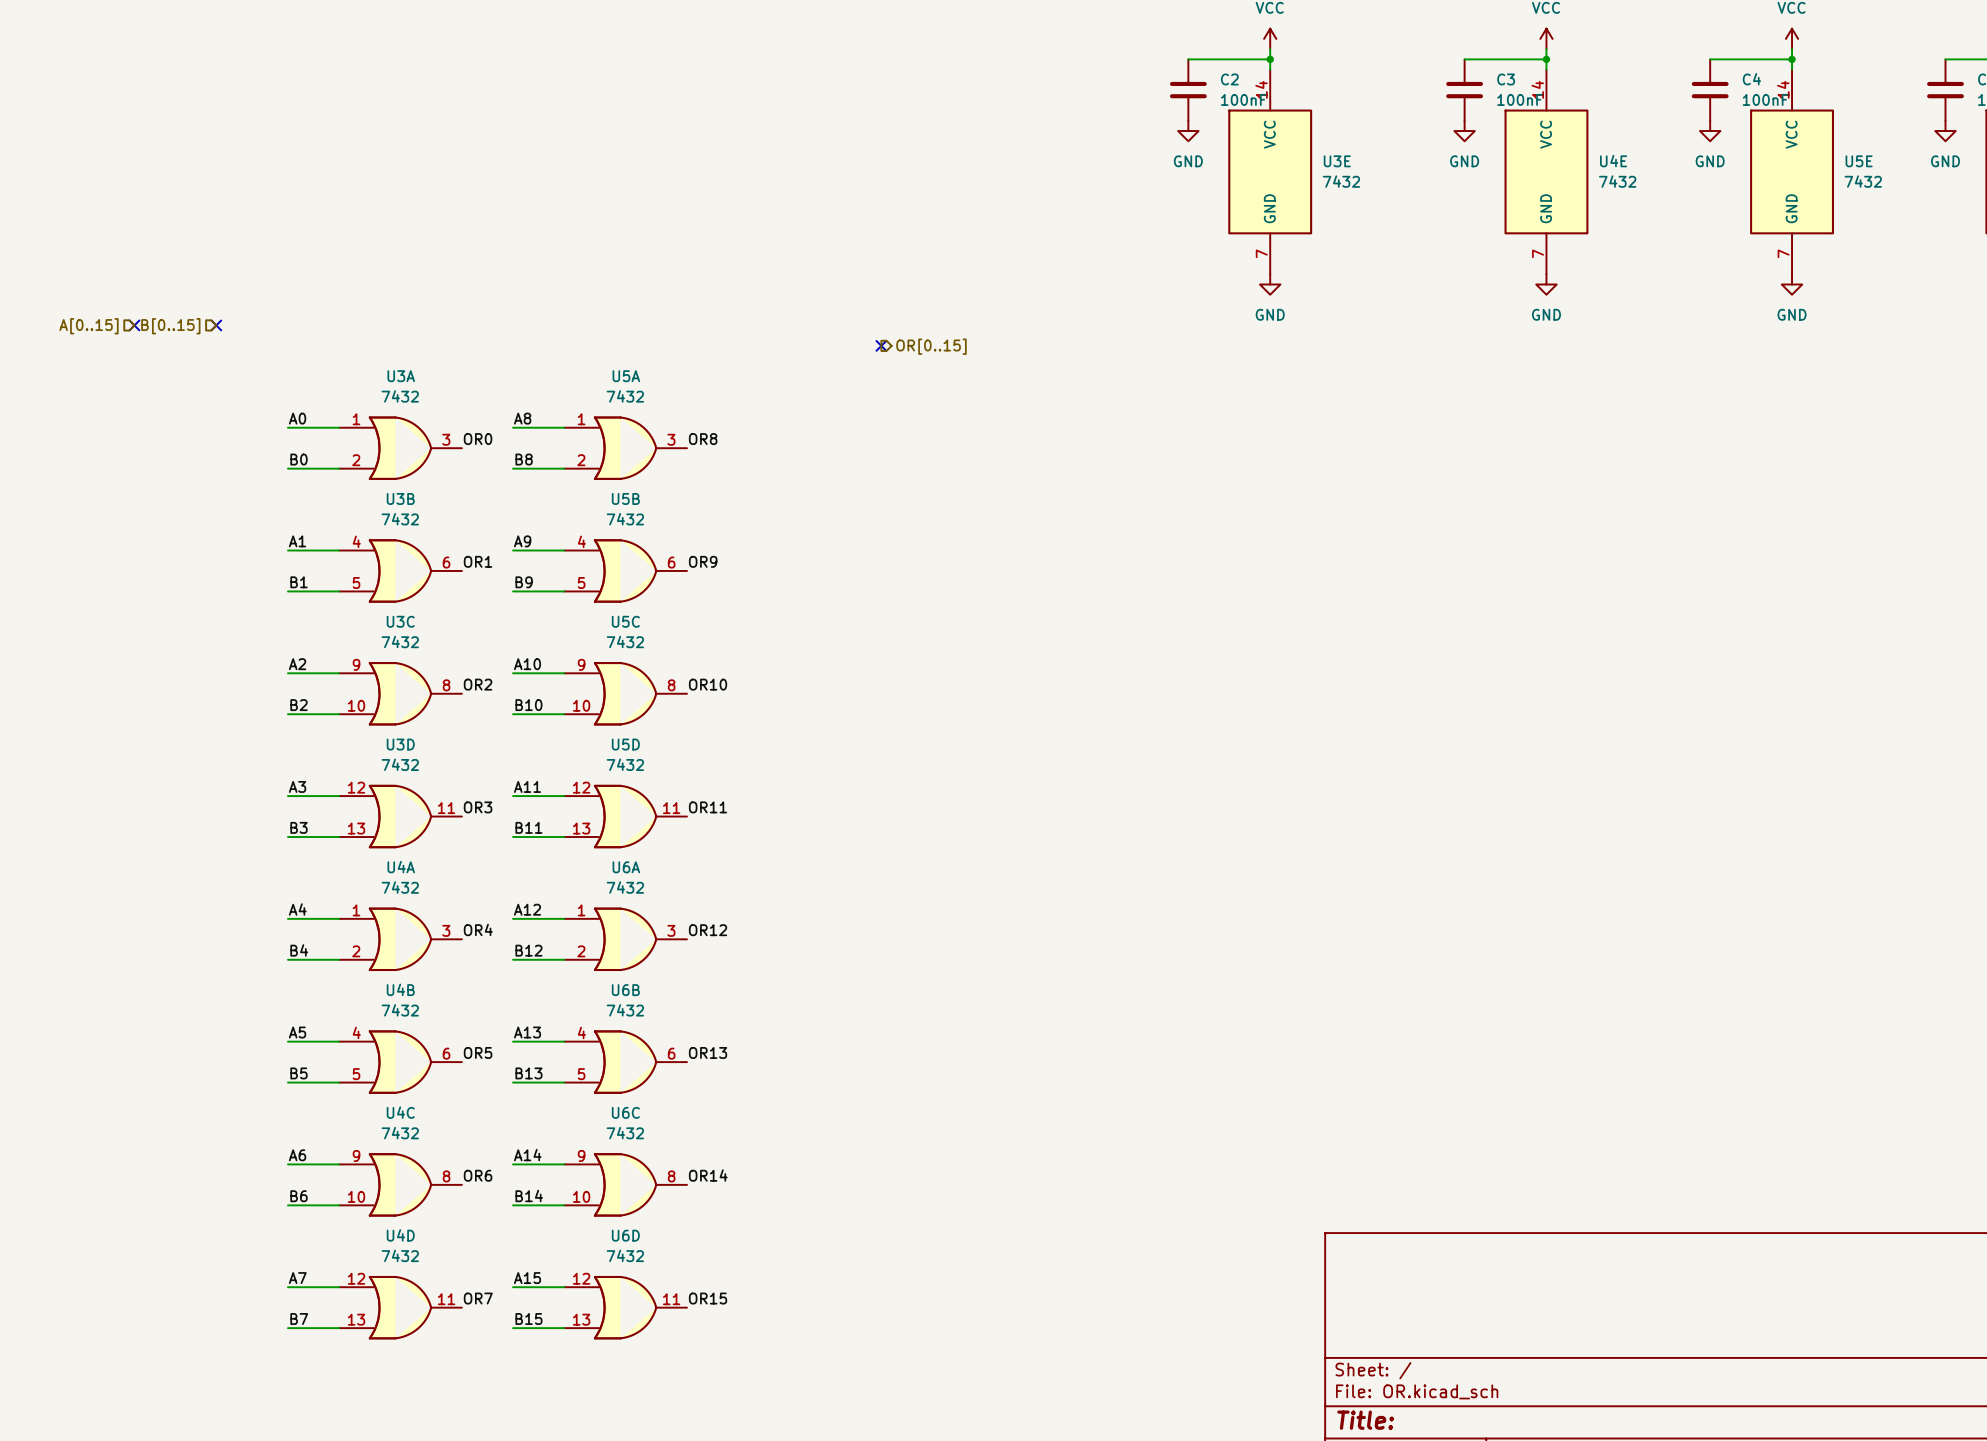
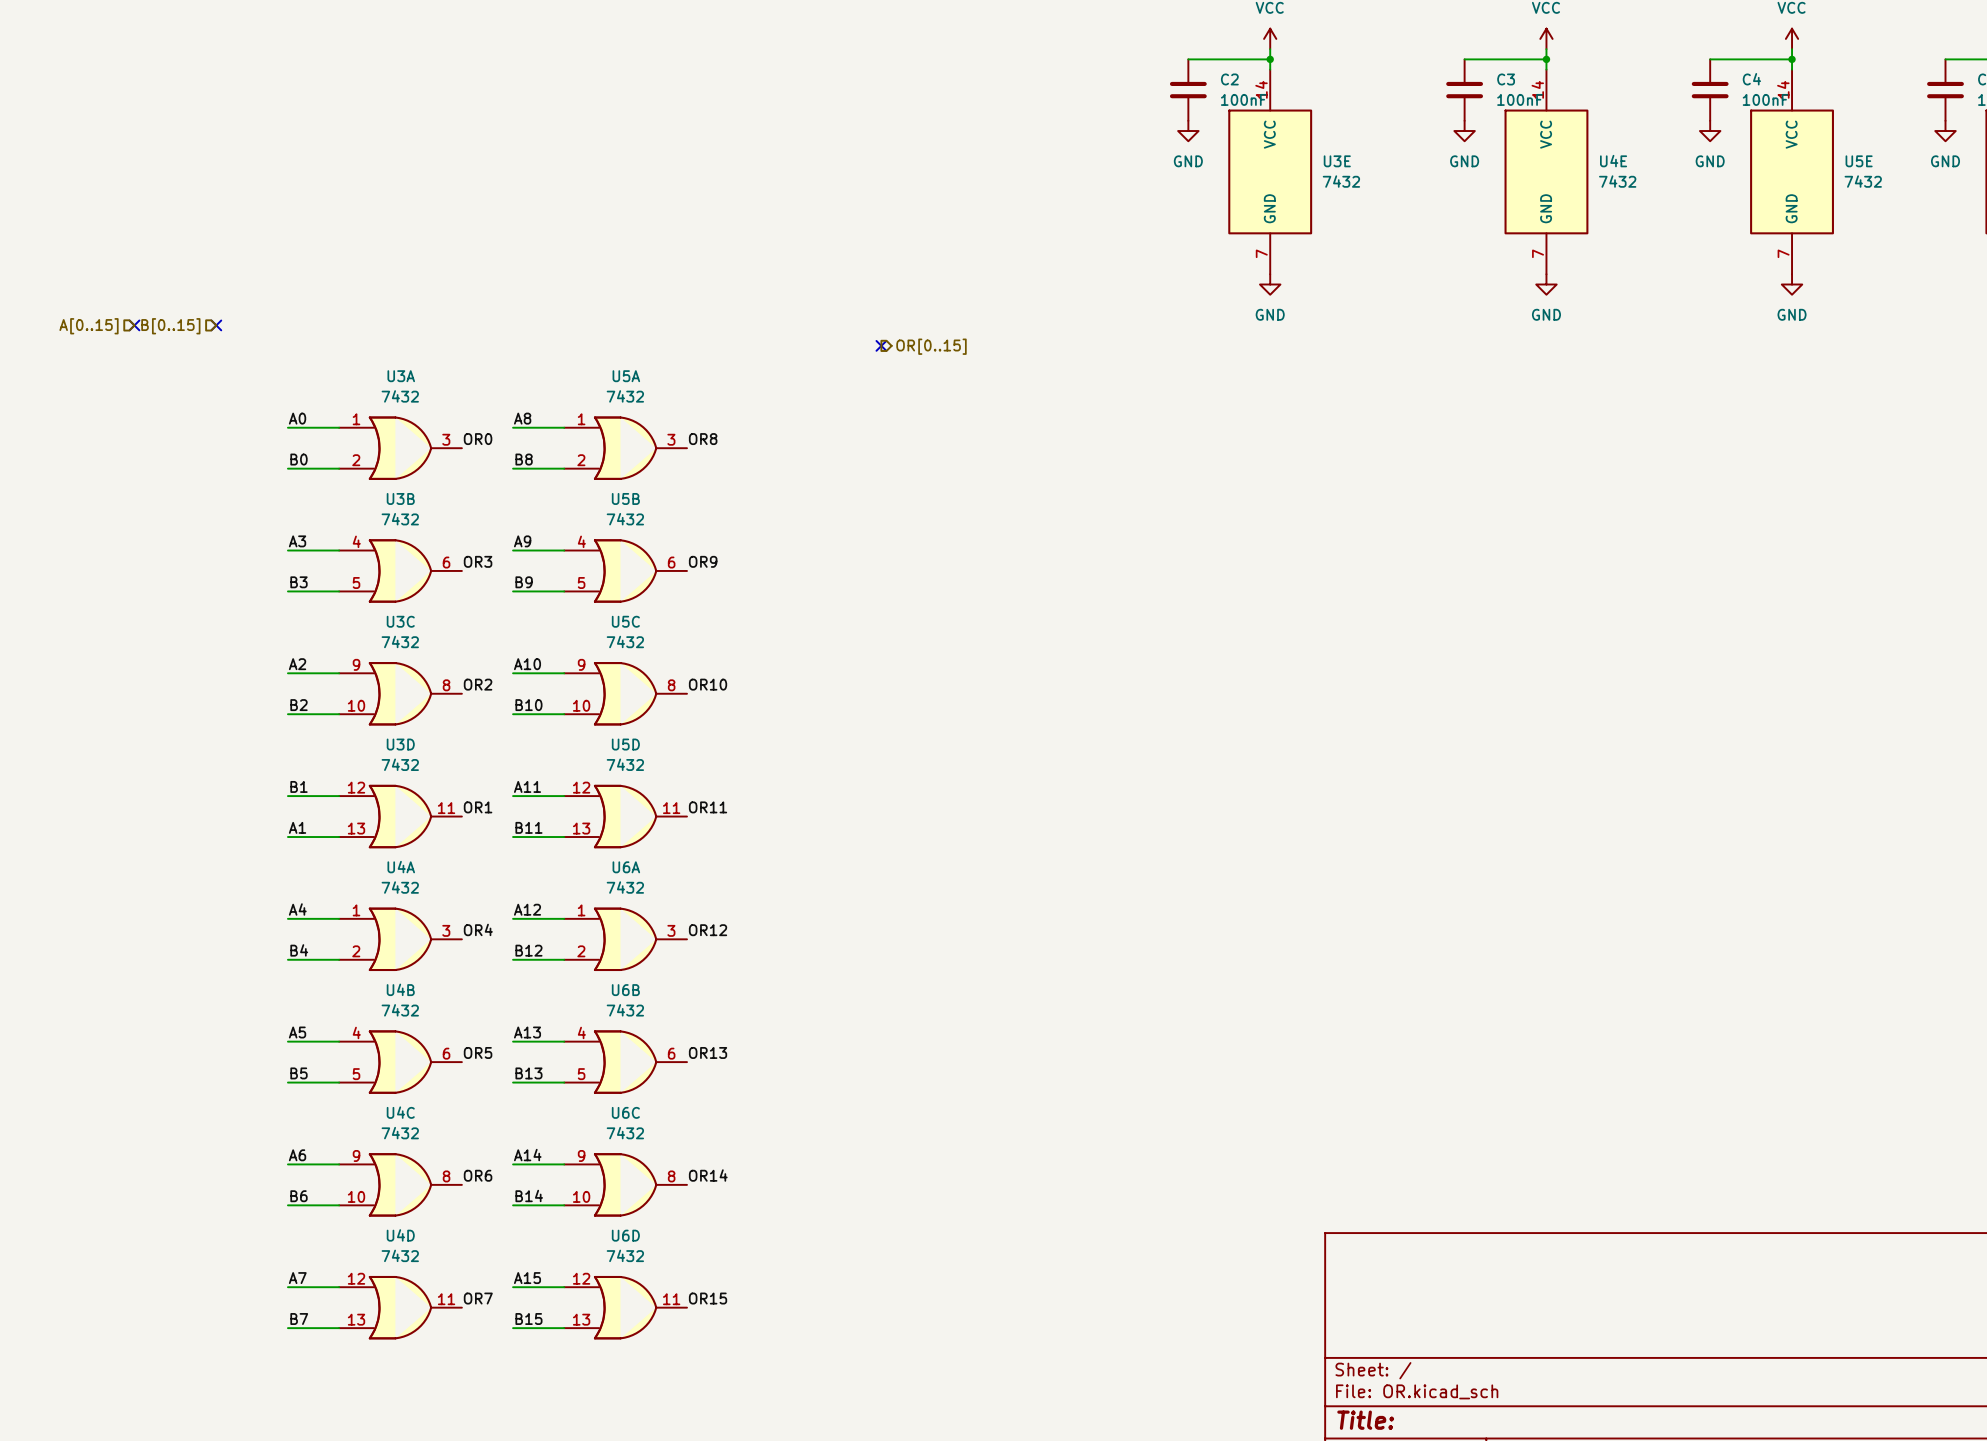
label: A1 (297, 541) -> A3 (297, 541)
label: OR1 (478, 561) -> OR3 (478, 561)
label: B1 (299, 582) -> B3 (299, 582)
label: A3 (297, 786) -> B1 (299, 786)
label: OR3 (478, 807) -> OR1 (478, 807)
label: B3 (299, 827) -> A1 (297, 827)

